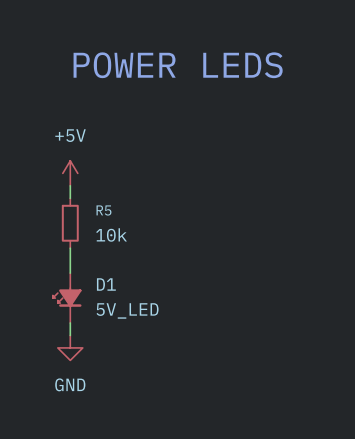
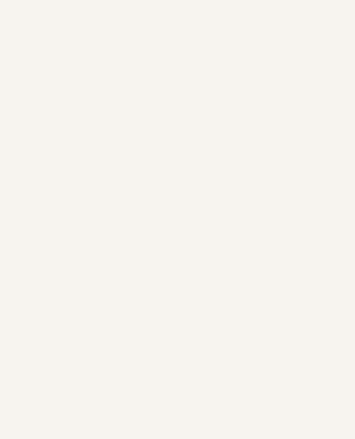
text: POWER LEDS (178, 65) -> none
power symbol: +5V (70, 173) -> none
wire: (70, 185) (70, 198) -> none
R5: 10k (70, 223) -> none
wire: (70, 248) (70, 273) -> none
D1: 5V_LED (67, 298) -> none
wire: (70, 323) (70, 335) -> none
power symbol: GND (70, 347) -> none

